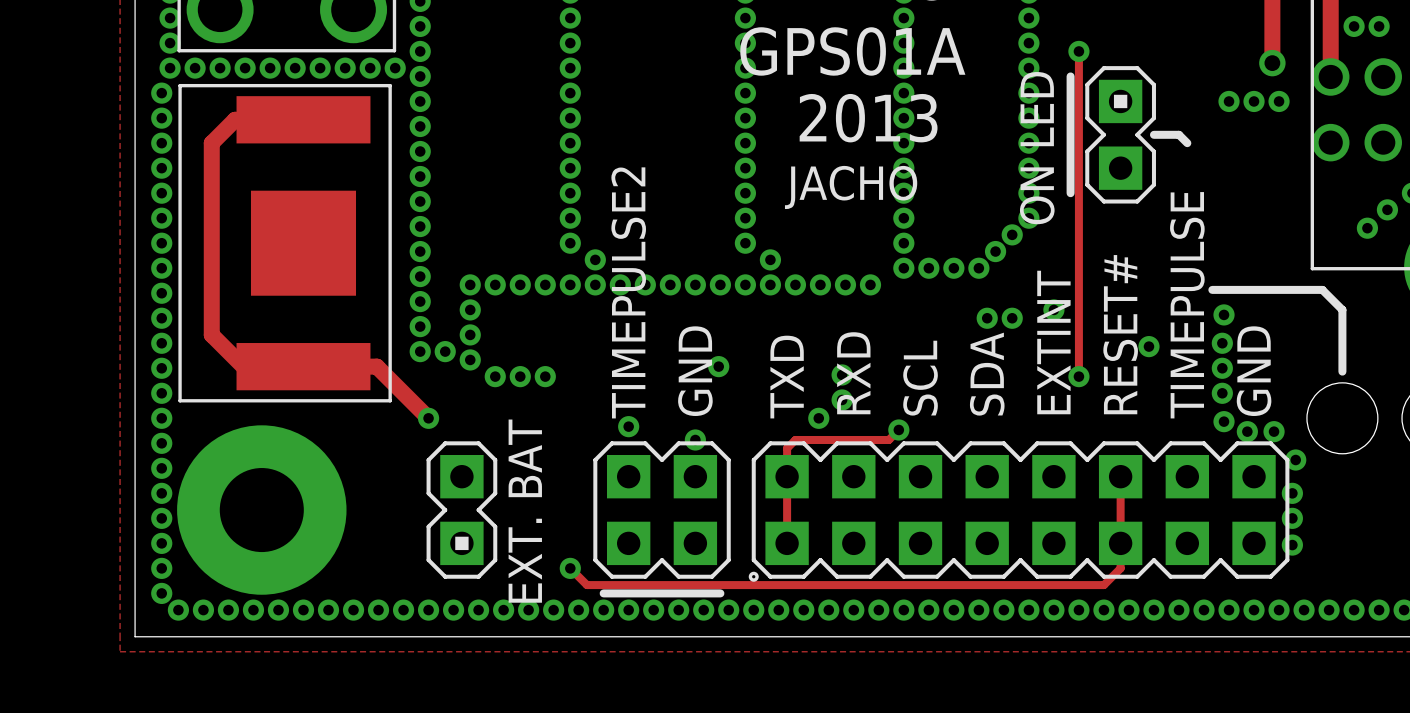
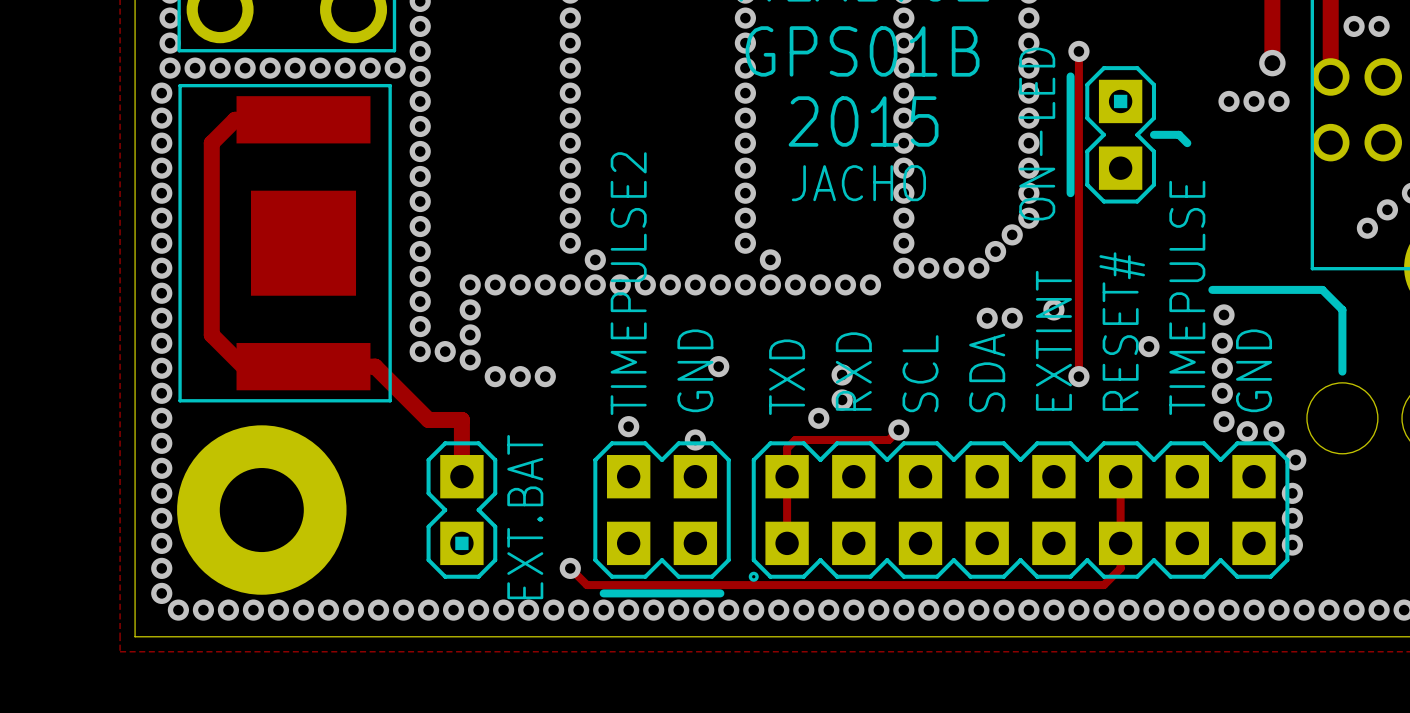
text: GPS01A (852, 51) -> GPS01B (862, 51)
text: 2013 (868, 118) -> 2015 (863, 121)
text: ON LED (1037, 148) -> ON-LED (1037, 134)
track: (375, 366) (428, 418) -> (375, 366) (428, 419) (461, 419) (461, 476)
via: (428, 418) -> none
text: EXT. BAT (525, 511) -> EXT.BAT (525, 517)

